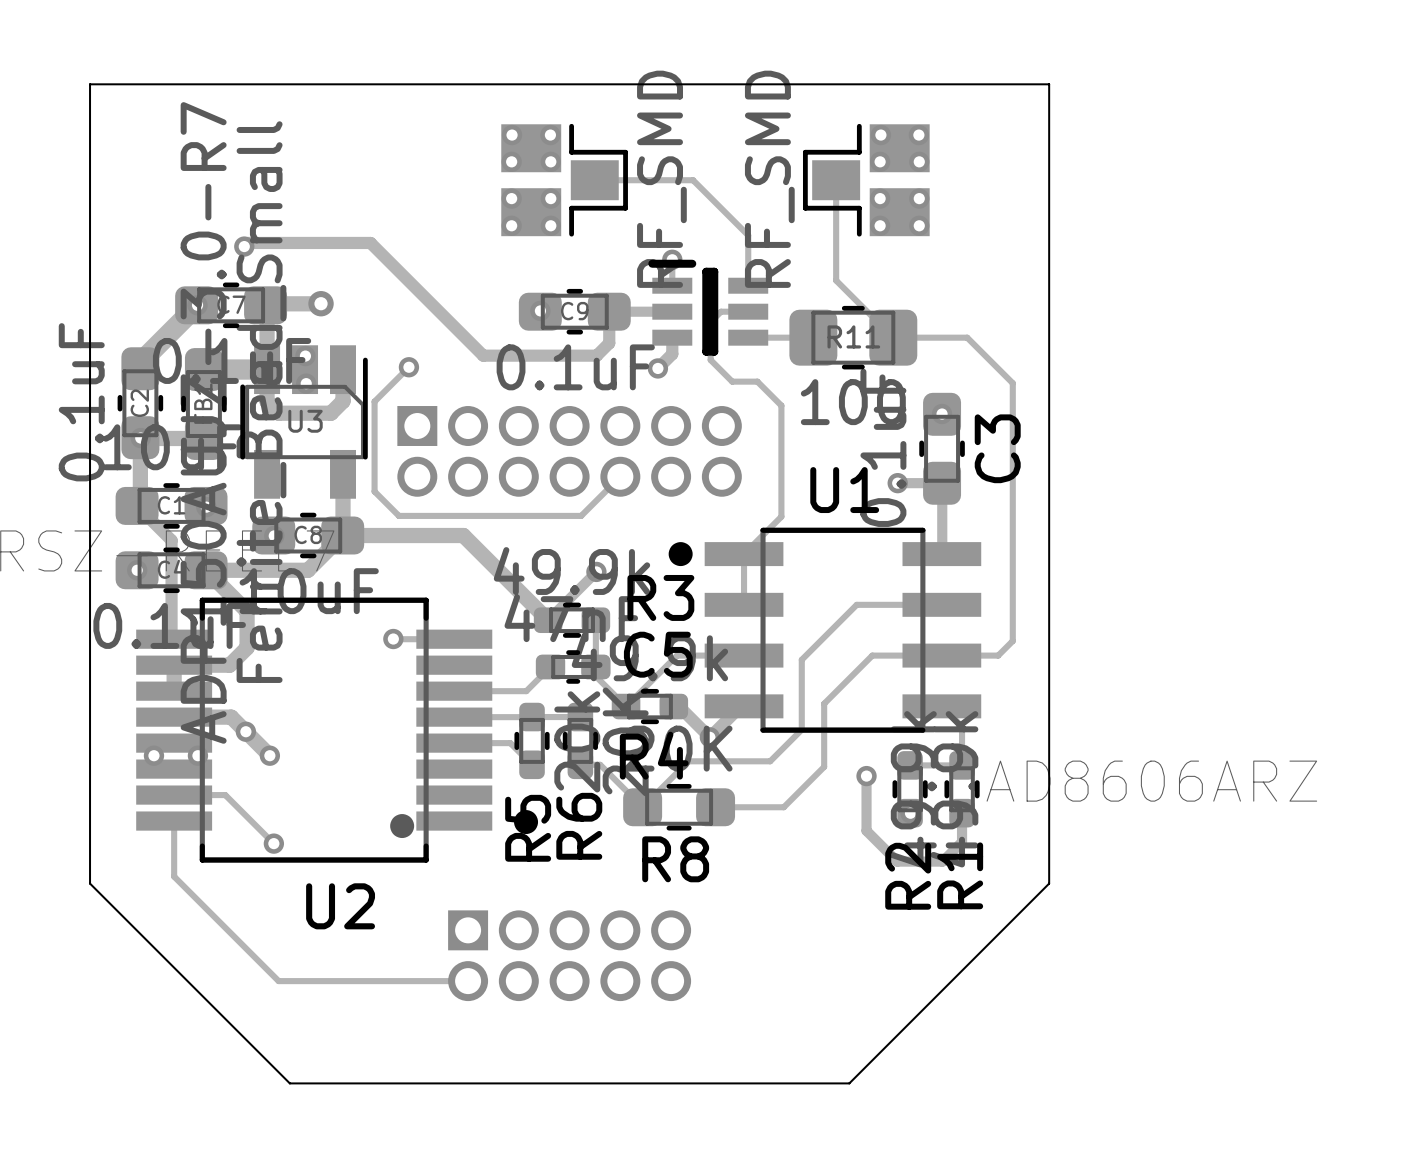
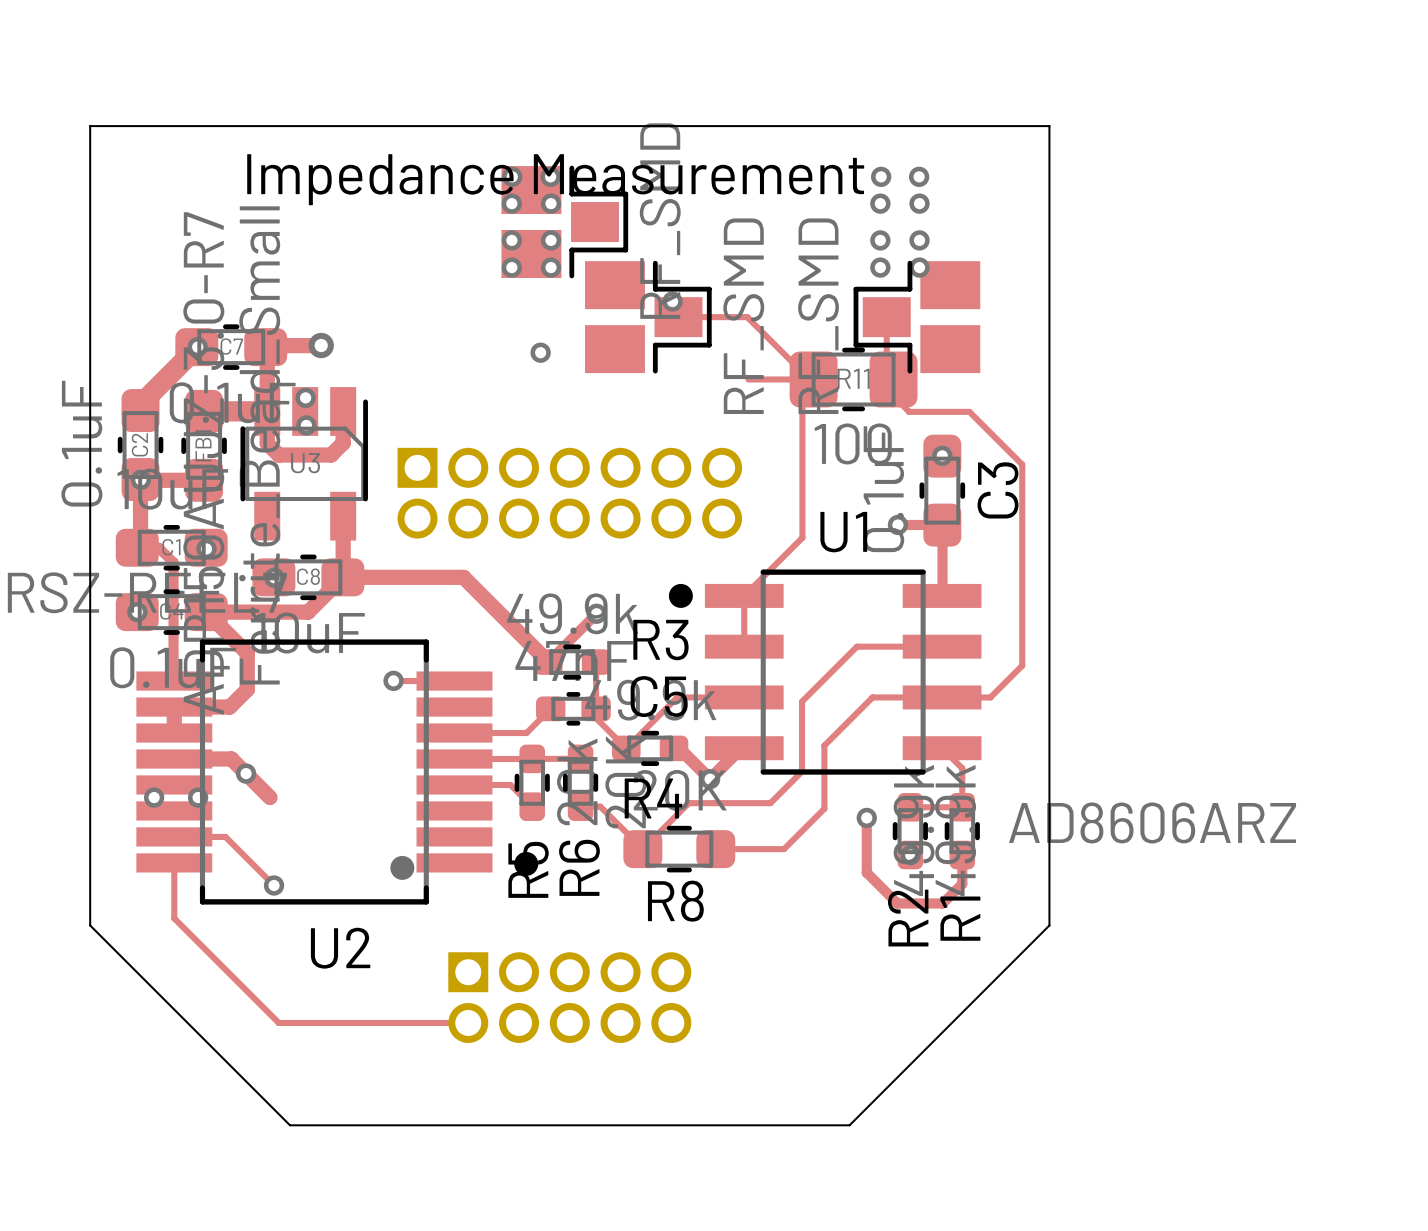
text: none -> Impedance Measurement (555, 179)
track: (594, 180) (693, 180) (748, 235) (748, 285) -> none
track: (836, 180) (836, 280) (893, 337) (967, 337) (1012, 383) (1012, 641) (998, 655) (990, 655) -> (886, 318) (886, 389) (909, 411) (969, 411) (1022, 464) (1022, 665) (990, 697)
part position: (866, 180) -> (916, 317)
track: (244, 246) (247, 242) (370, 242) (483, 355) (596, 355) (609, 343) (609, 311) (672, 311) -> none
via: (244, 246) -> none
part: none -> RF_SMD (648, 317)
part: (708, 307) -> none
C9: 0.1uF (574, 311) -> none
track: (748, 311) (721, 311) (710, 322) (710, 360) (732, 381) (757, 381) (781, 405) (781, 516) -> (678, 317) (747, 317) (802, 372) (802, 537) (781, 558)
track: (672, 337) (672, 354) (657, 368) -> none
track: (408, 367) (374, 401) (374, 491) (398, 515) (581, 515) (620, 476) -> none
via: (408, 367) -> none
via: (657, 368) -> none
track: (137, 505) (171, 540) (171, 636) (173, 638) -> (137, 547) (158, 547) (173, 562) (174, 681)
via: (269, 755) -> none

